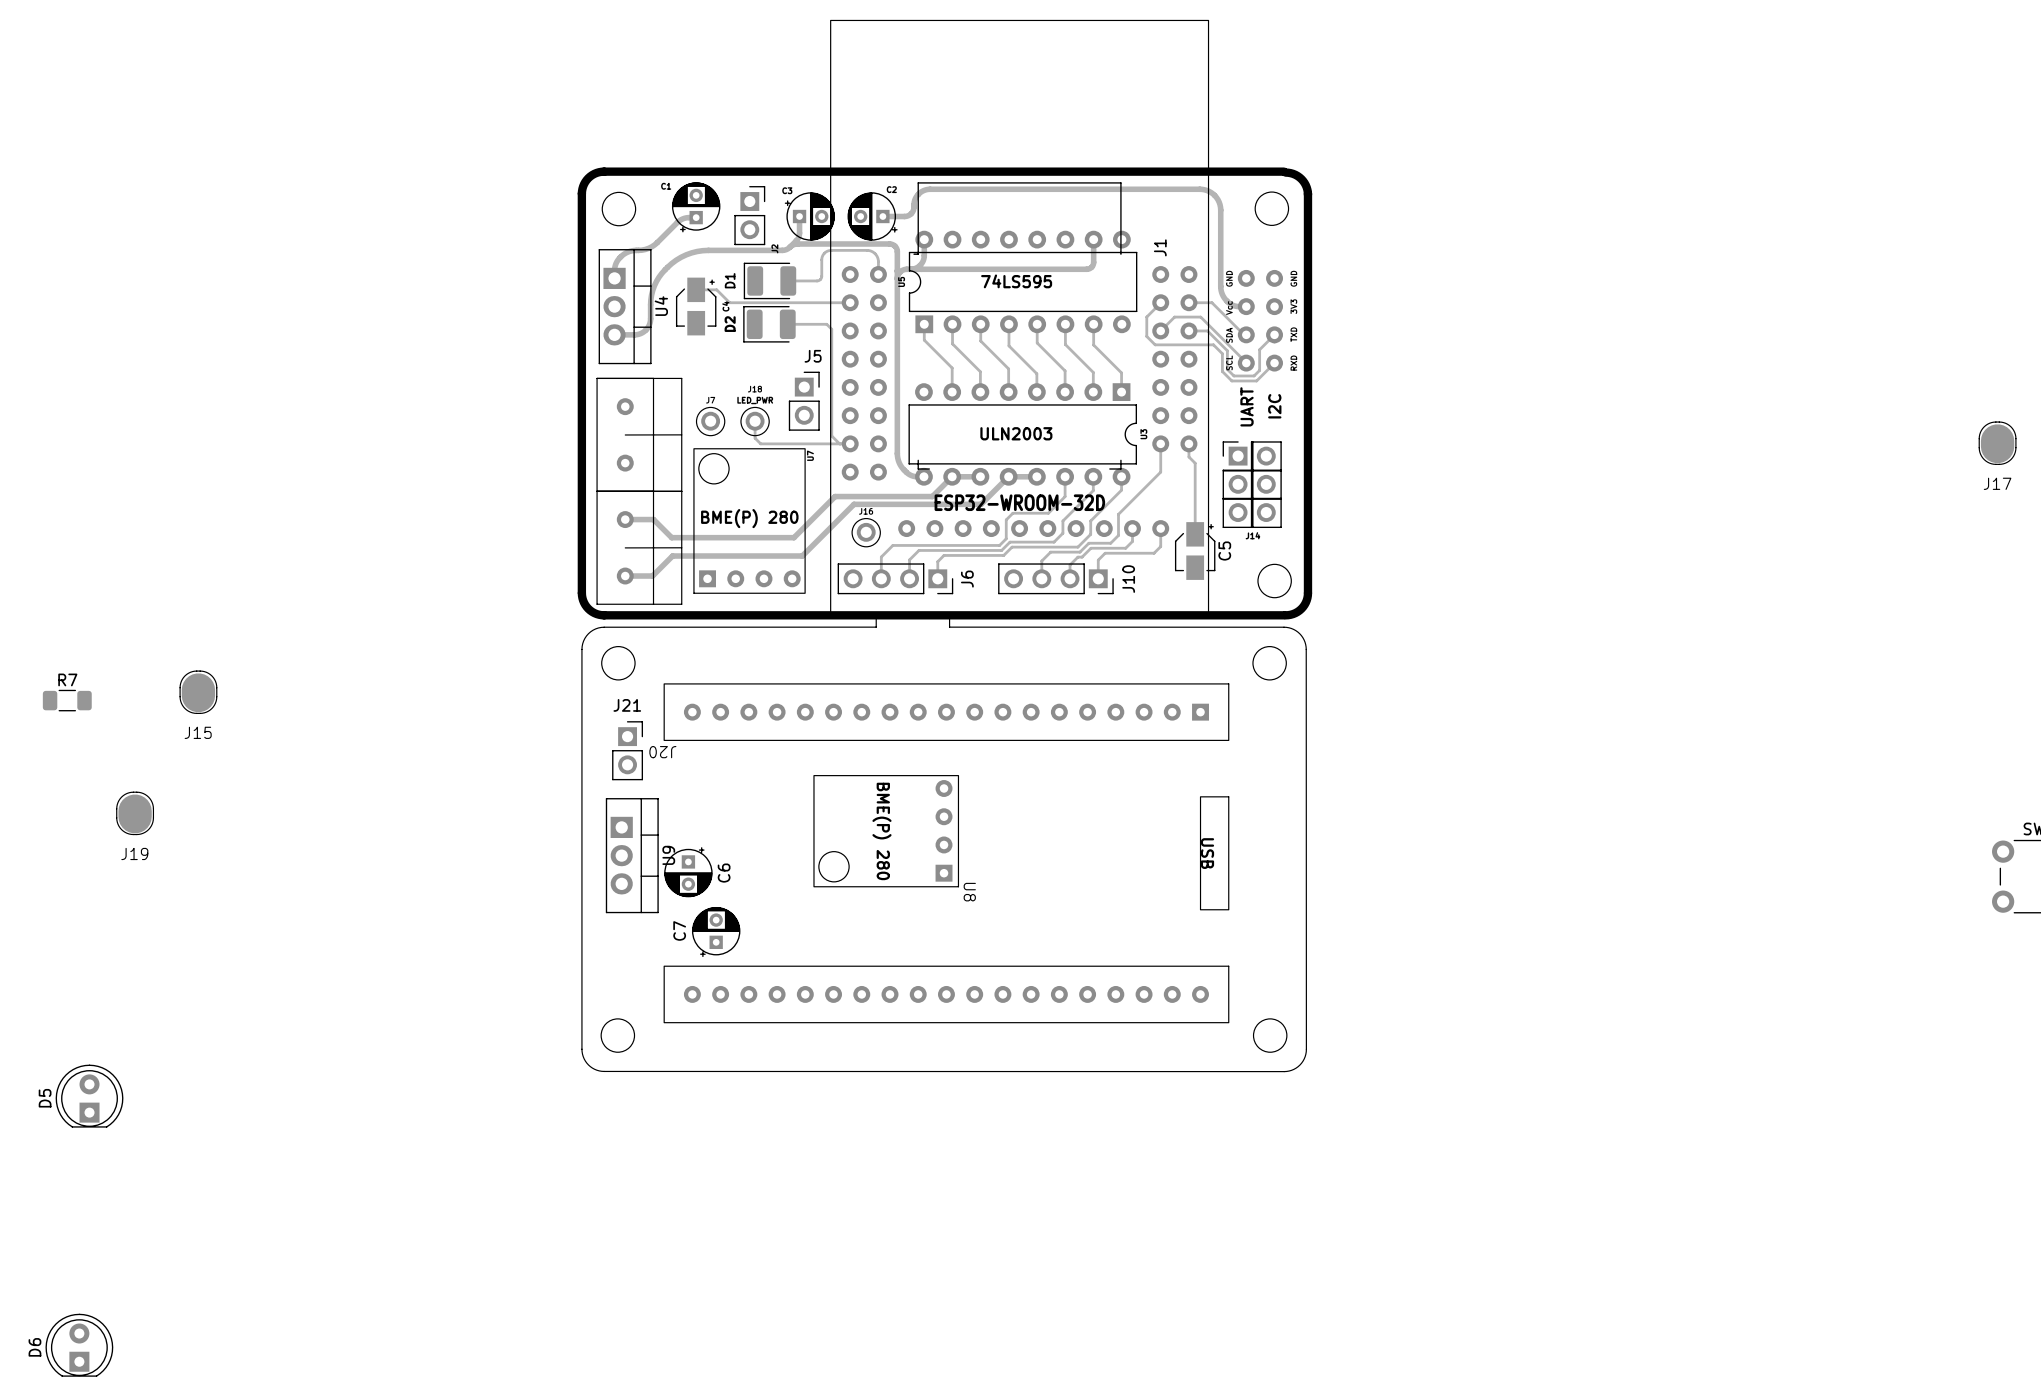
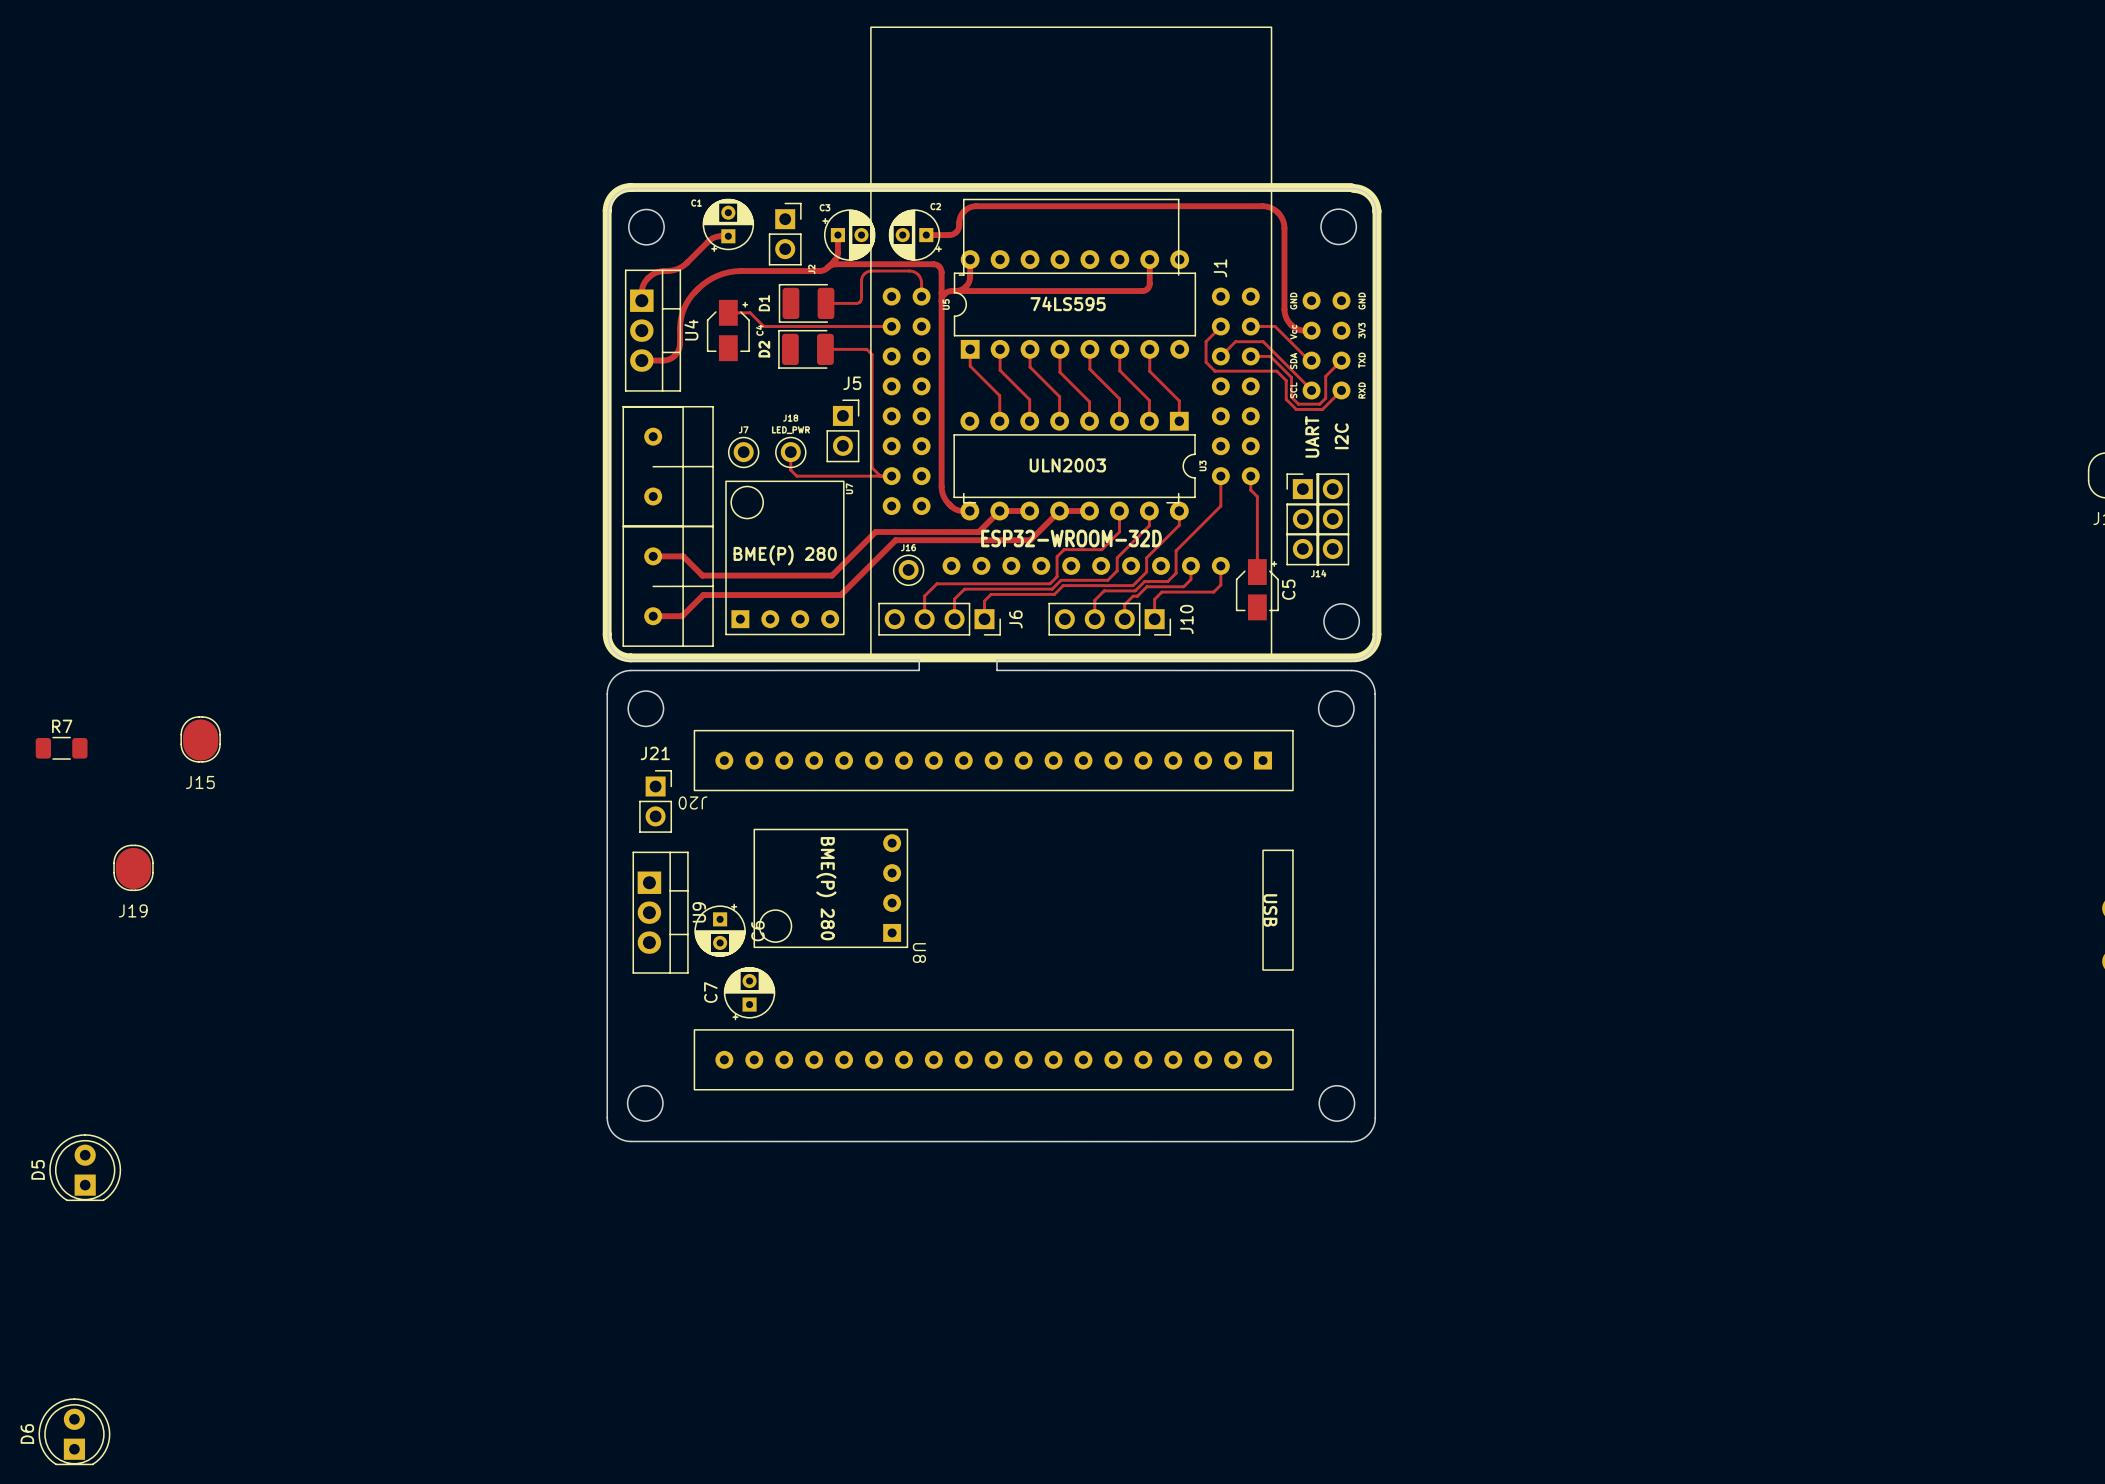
U8 position: (886, 831) -> (830, 888)

